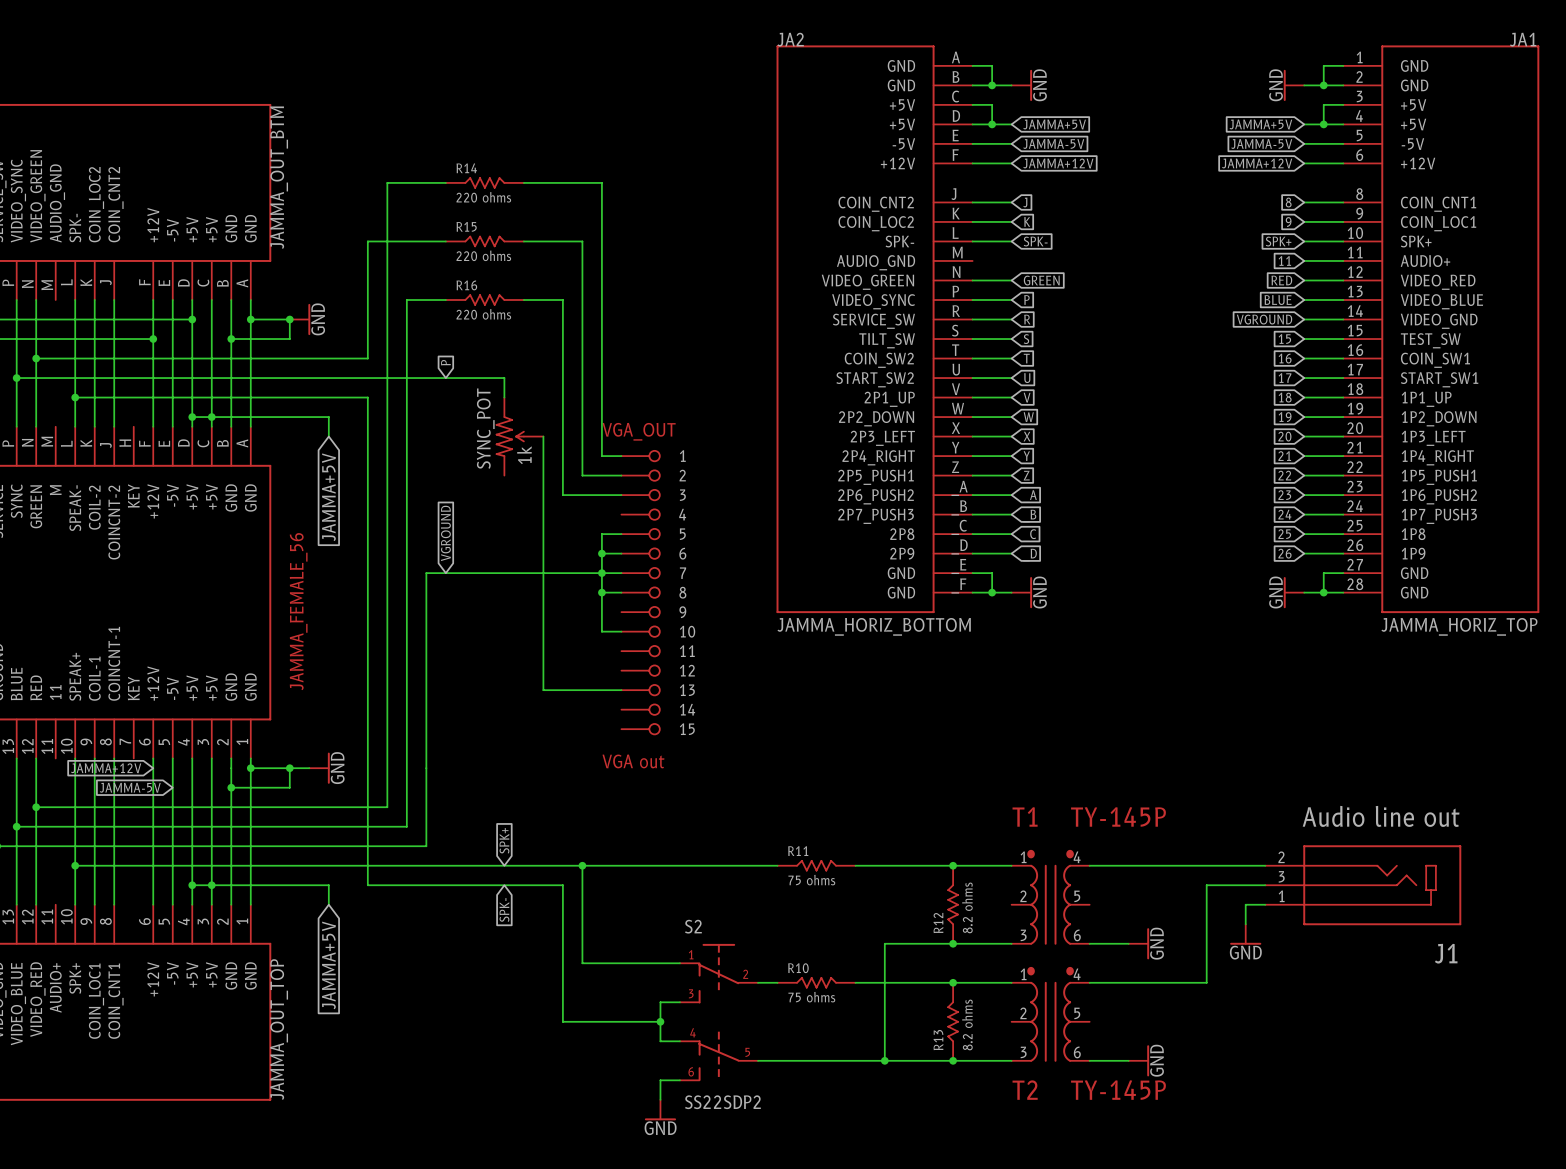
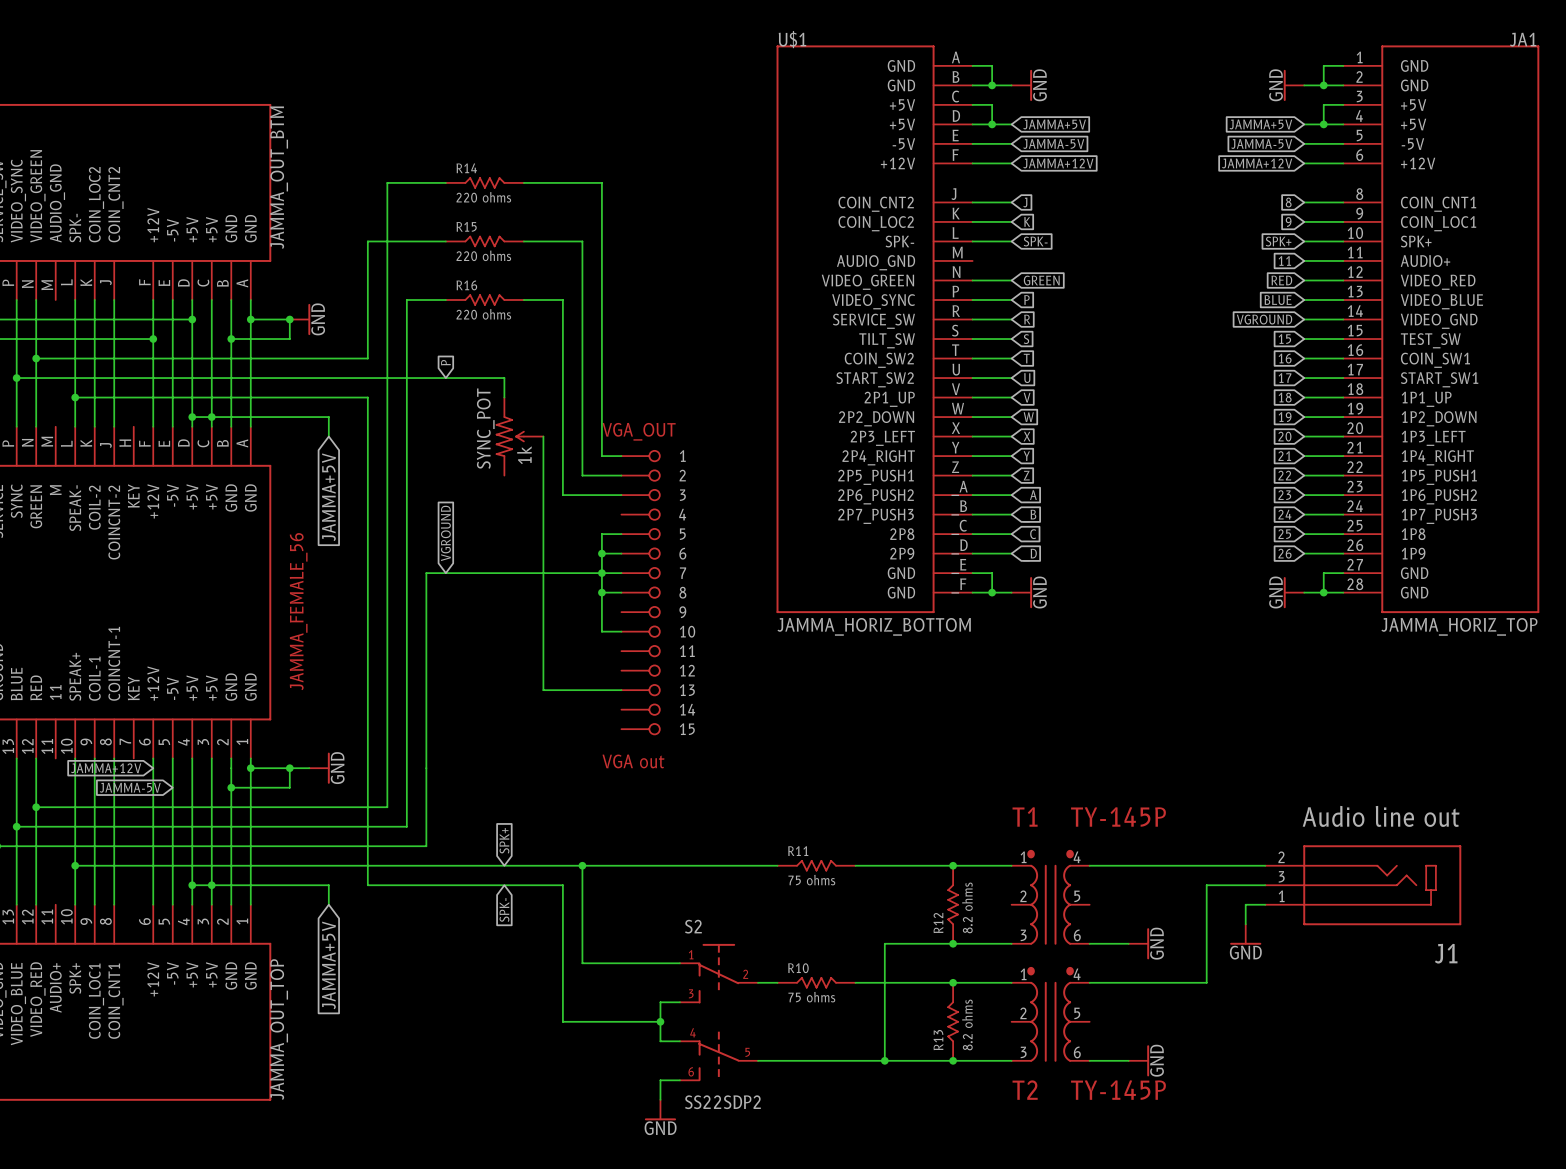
JA2 name: JA2 (790, 39) -> U$1 (792, 39)

